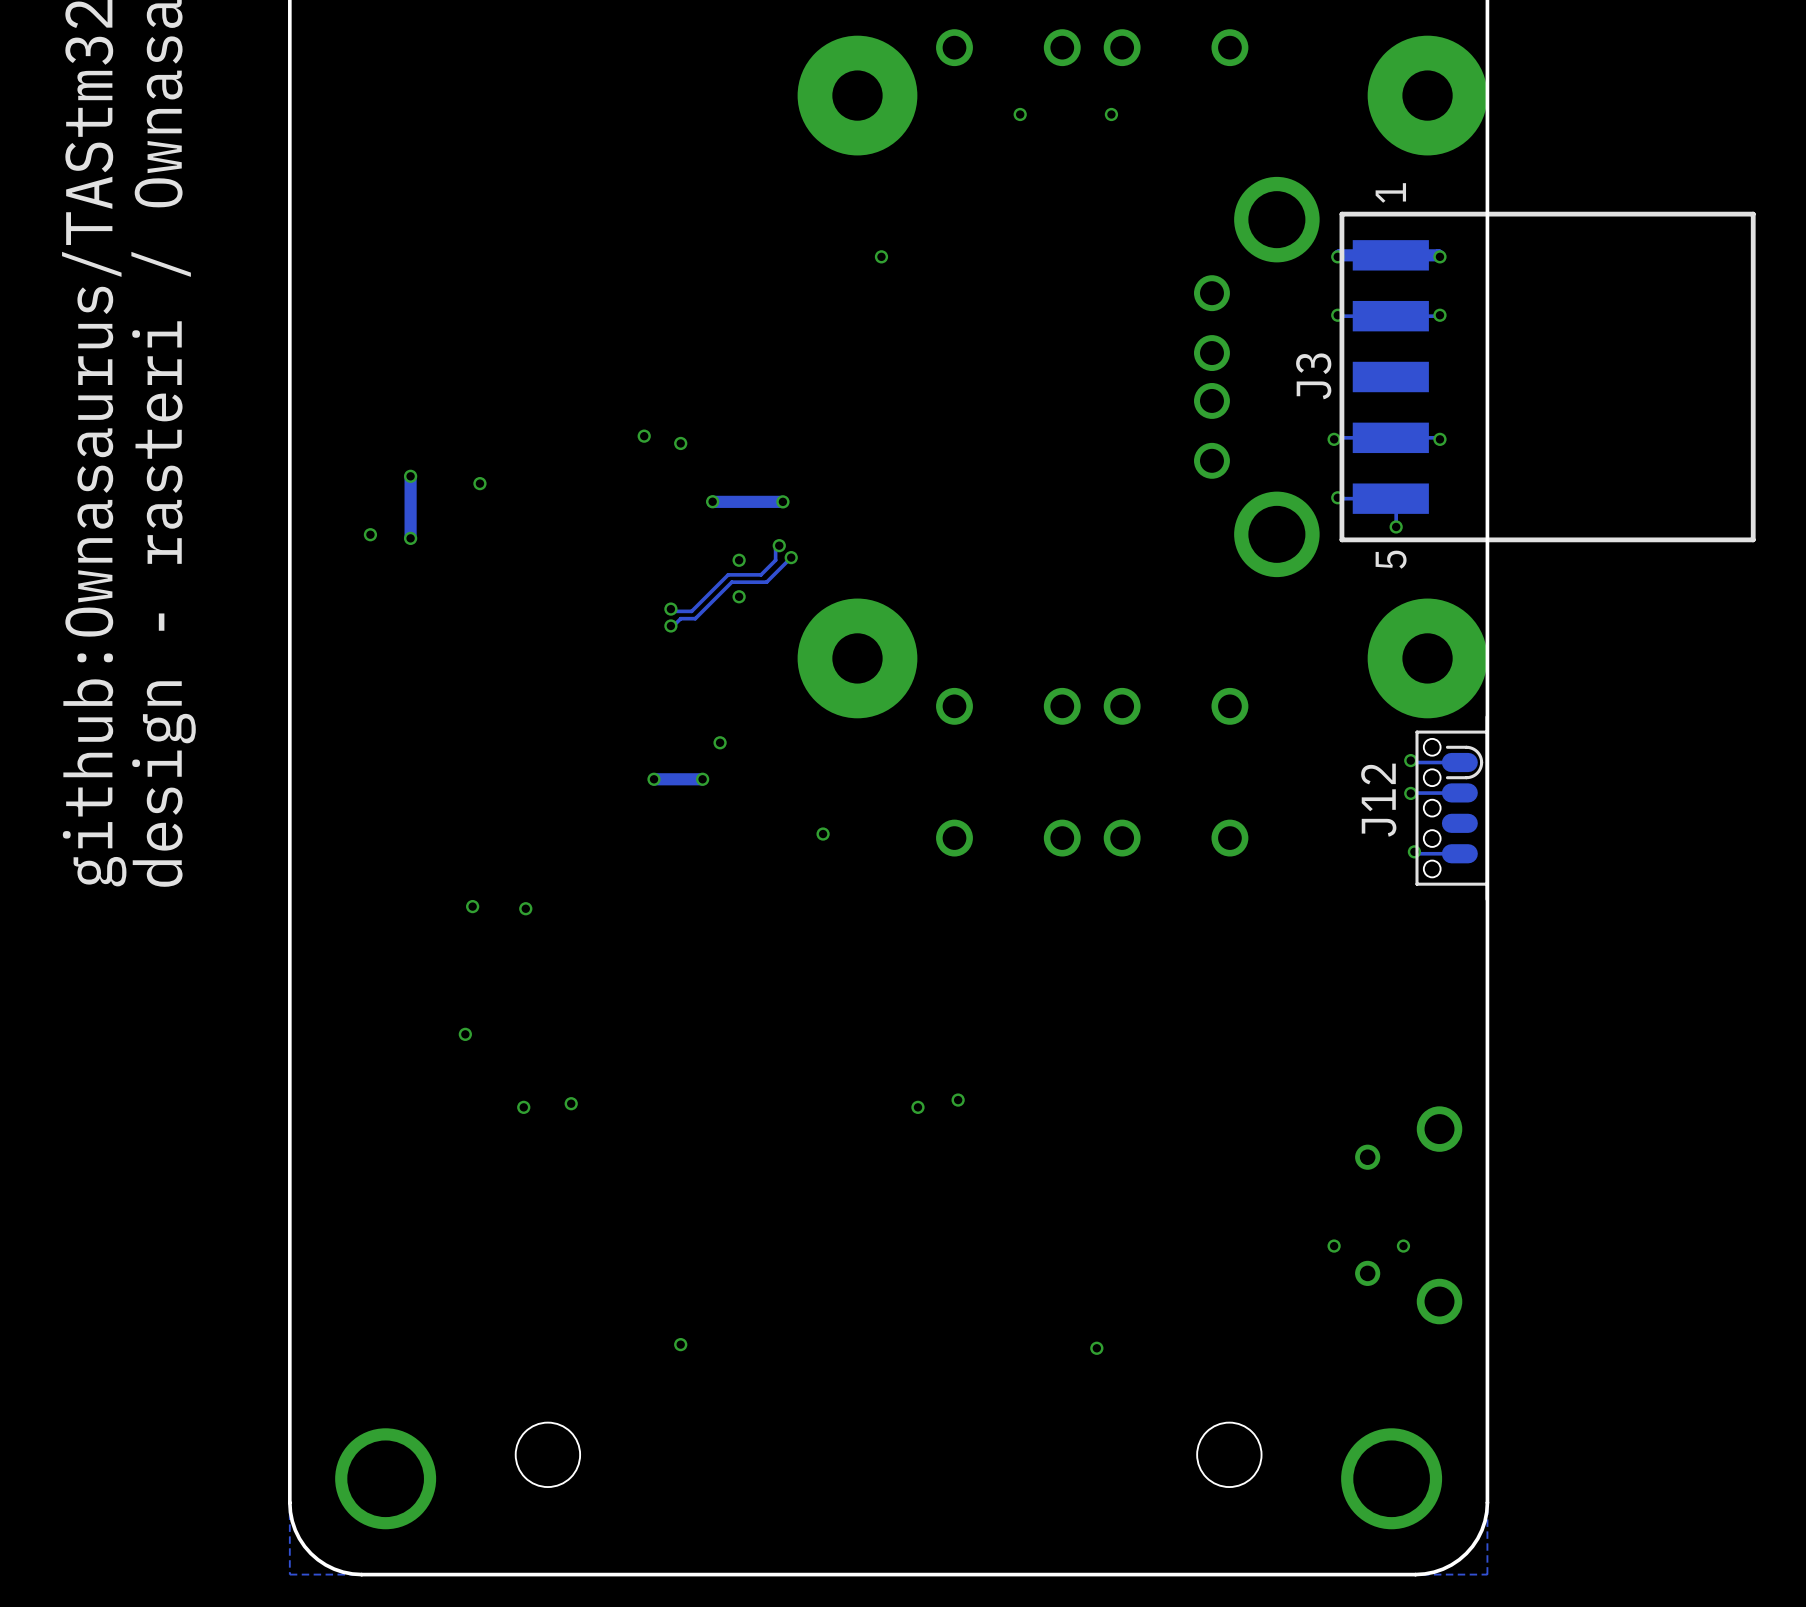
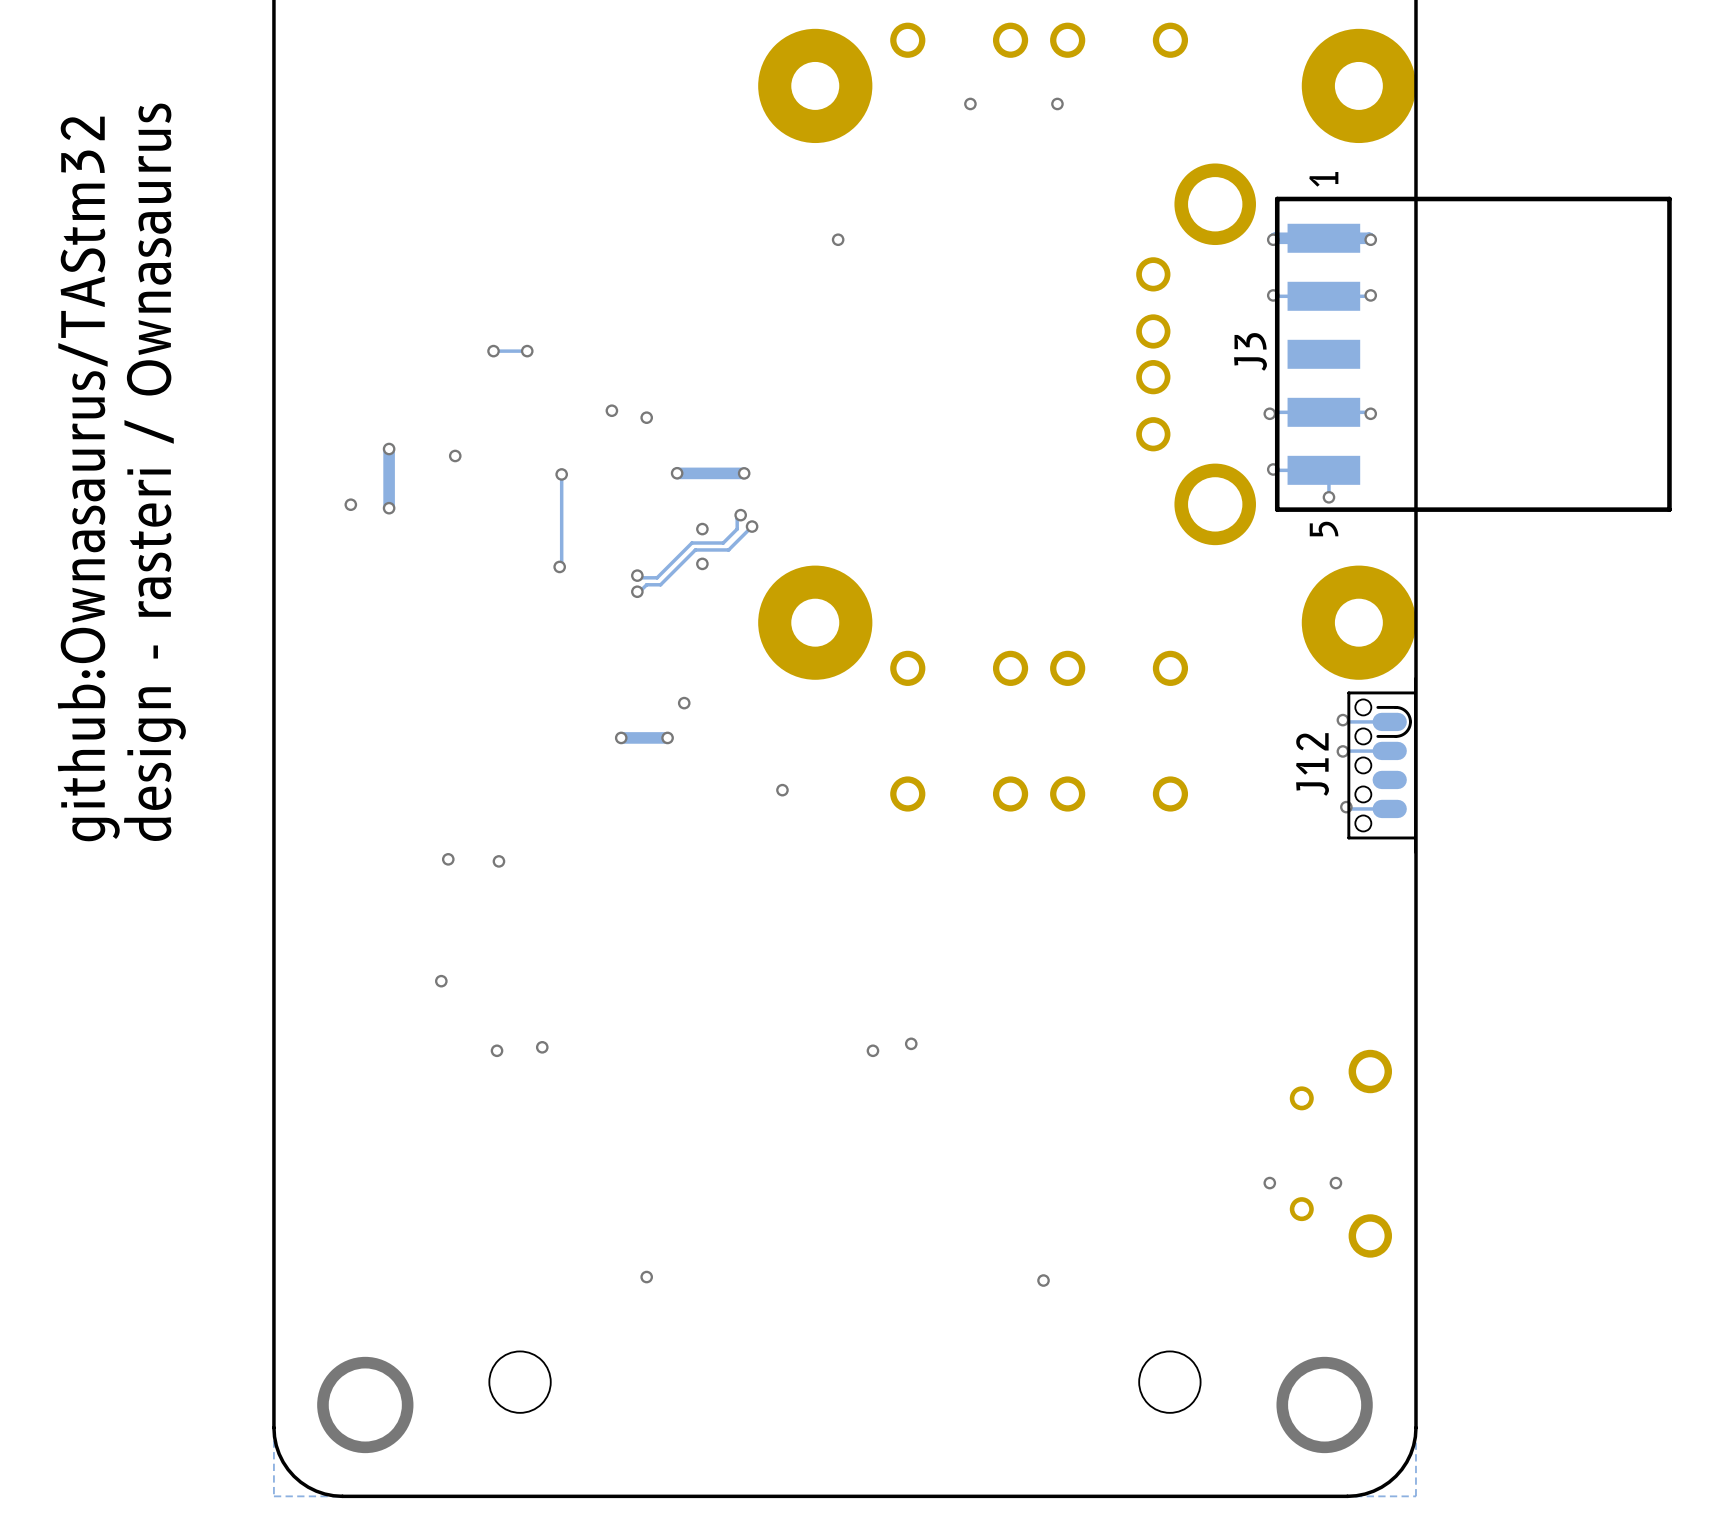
via: none -> (493, 351)
track: none -> (527, 351) (493, 351)
via: none -> (527, 351)
track: none -> (561, 474) (561, 564) (559, 566)
via: none -> (561, 474)
via: none -> (559, 566)

